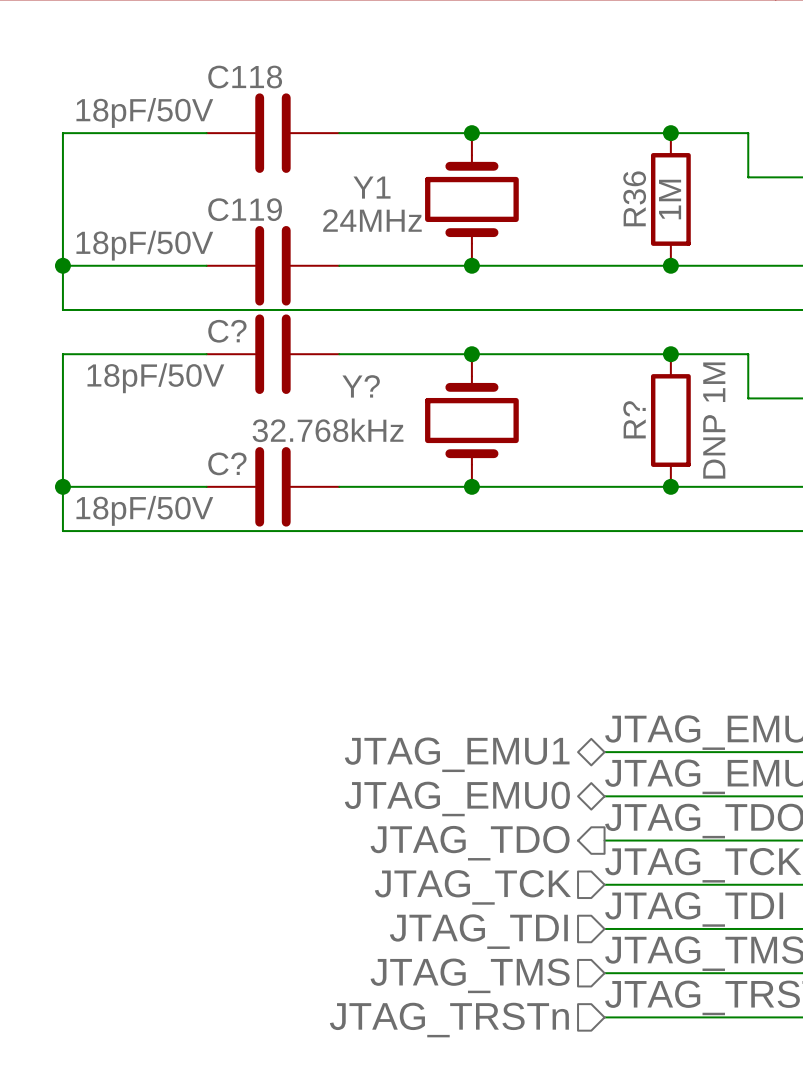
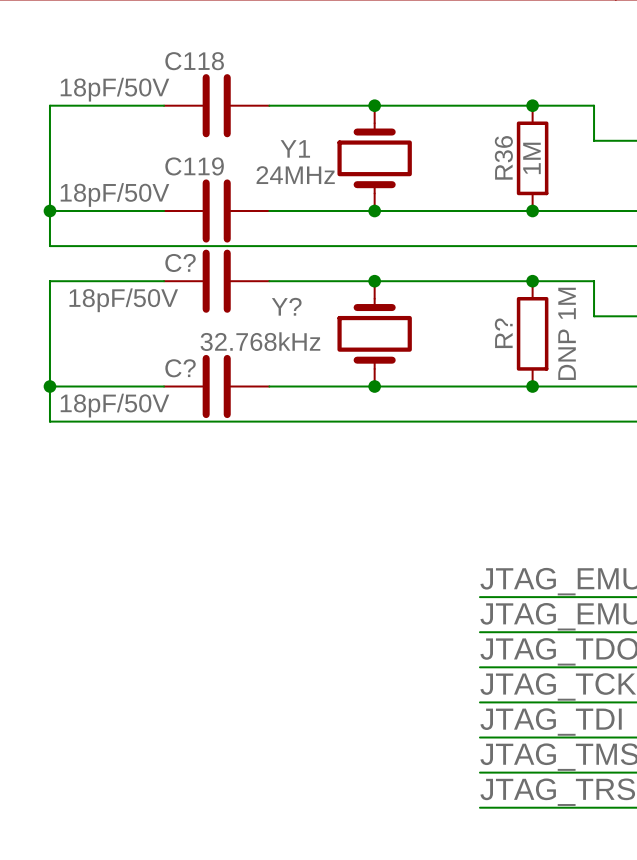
hierarchical label: JTAG_EMU1 (457, 754) -> none
hierarchical label: JTAG_EMU0 (457, 798) -> none
hierarchical label: JTAG_TDO (470, 843) -> none
hierarchical label: JTAG_TCK (472, 887) -> none
hierarchical label: JTAG_TDI (478, 931) -> none
hierarchical label: JTAG_TMS (470, 975) -> none
hierarchical label: JTAG_TRSTn (449, 1020) -> none

